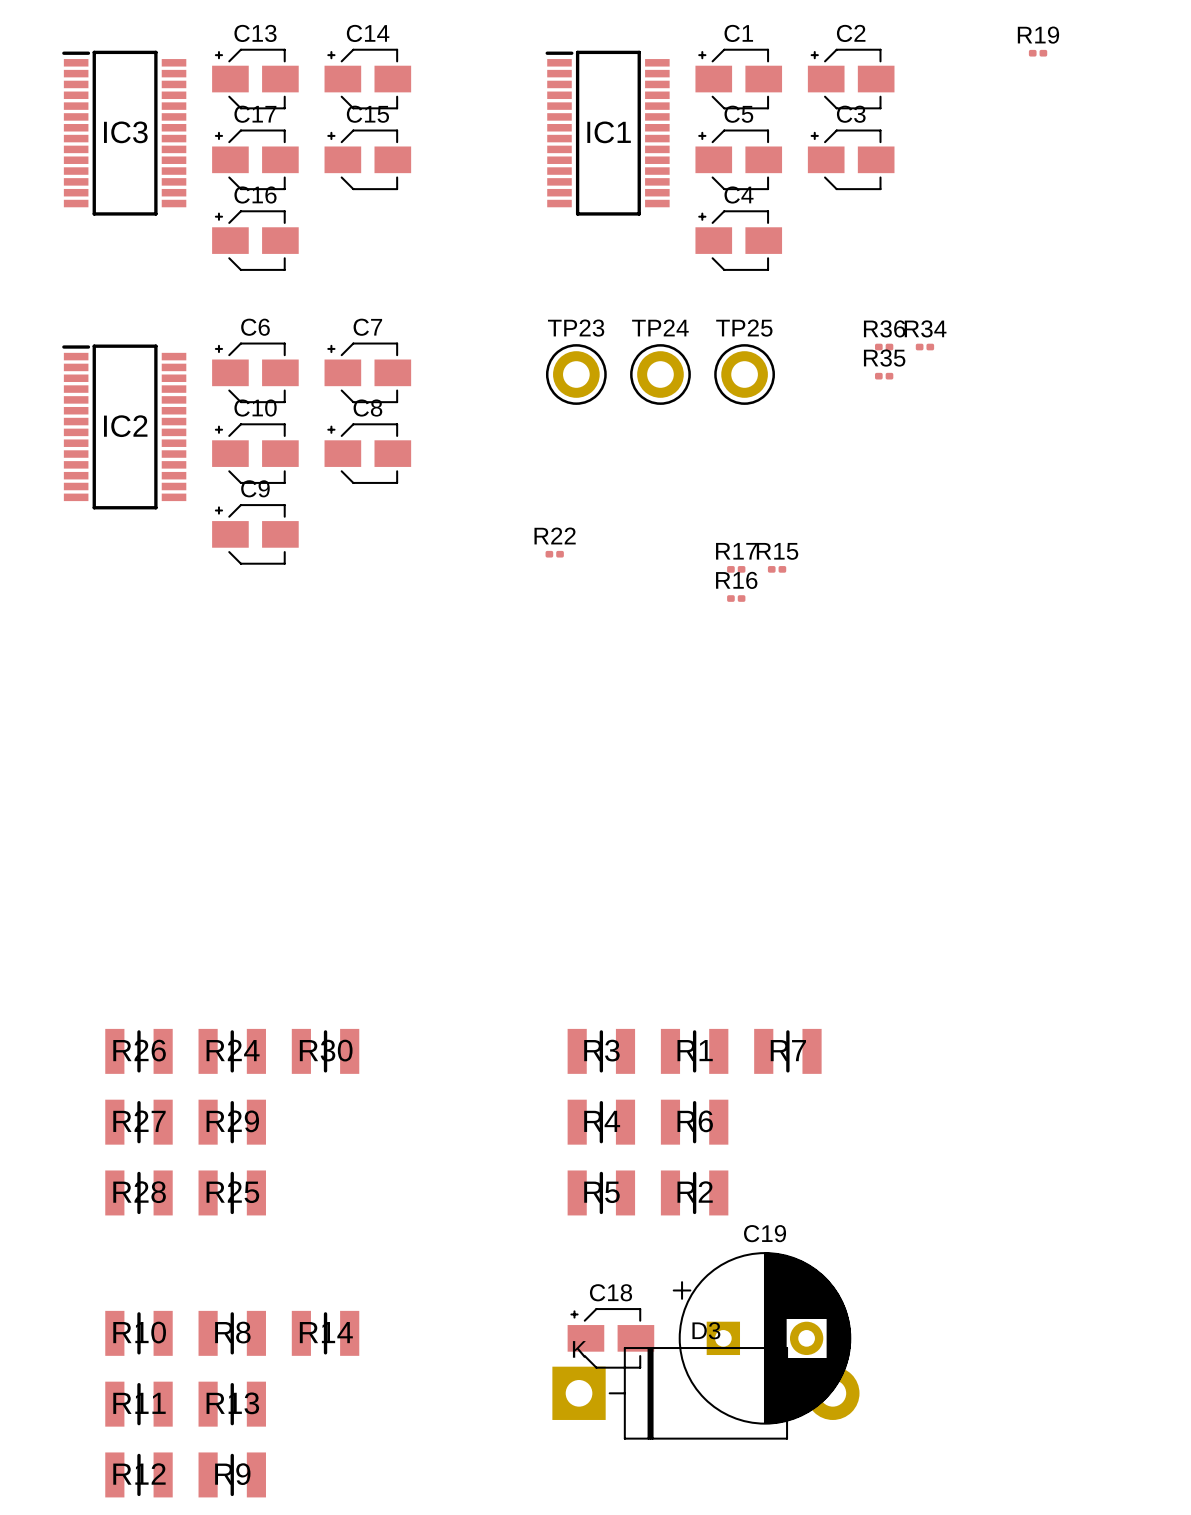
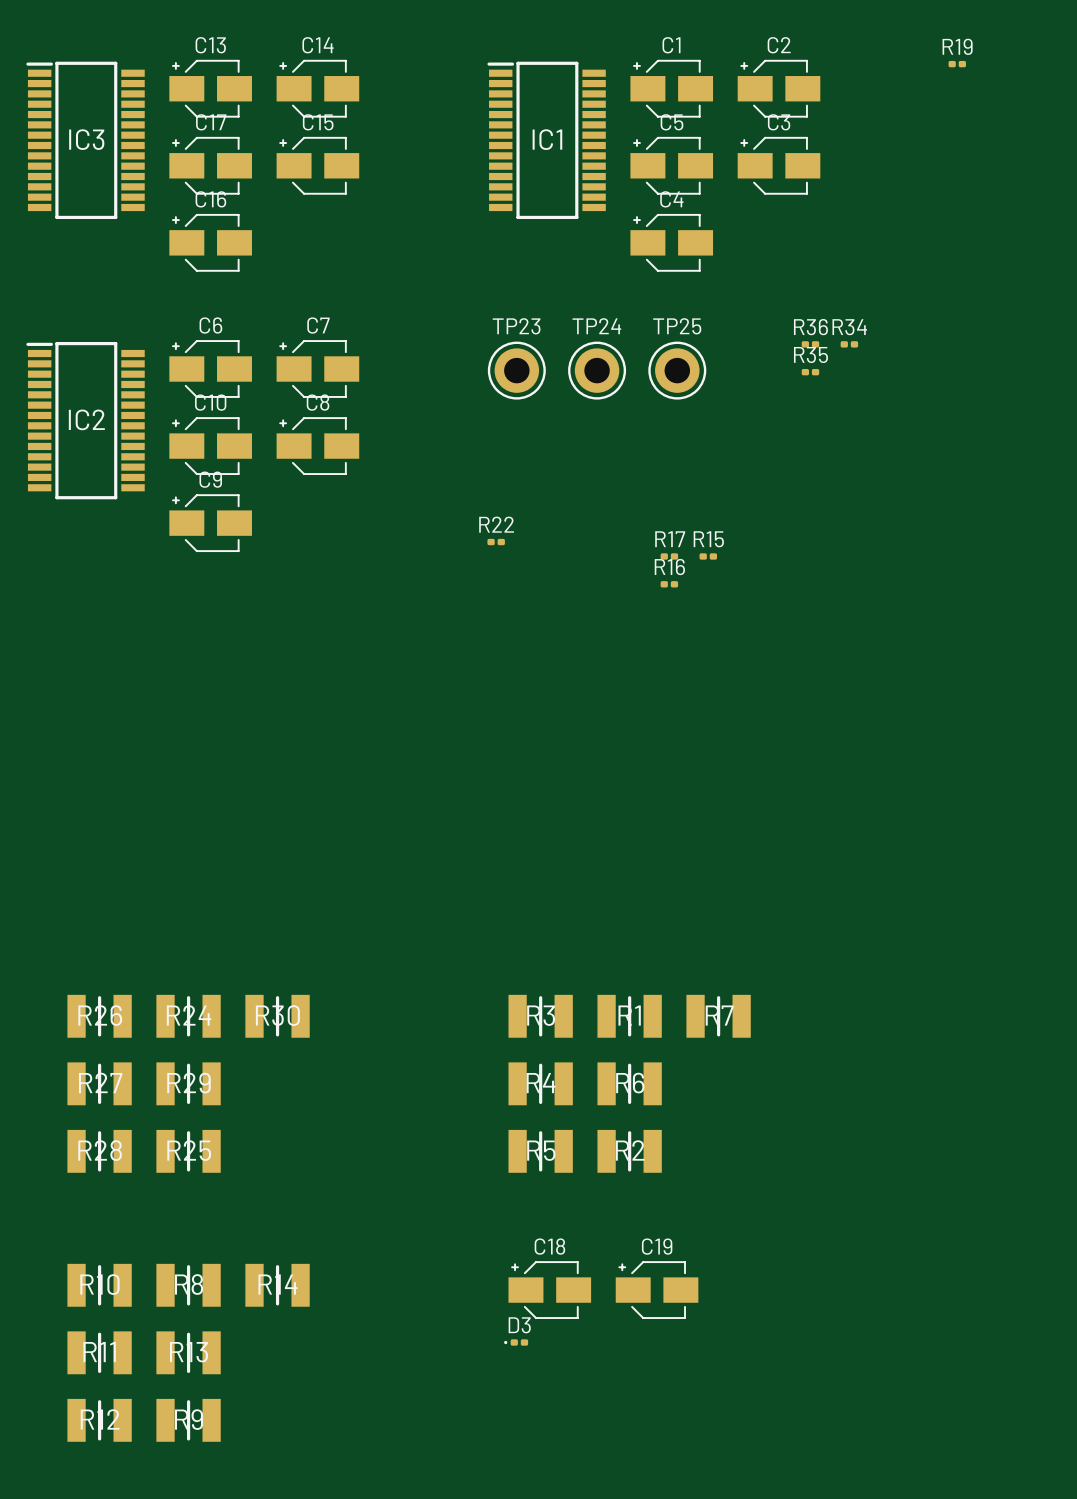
C19 name position: C19 (765, 1233) -> C19 (657, 1246)
C19 footprint: [672, 1252, 852, 1425] -> [615, 1261, 699, 1319]
D3 name position: D3 (706, 1330) -> D3 (519, 1325)
D3 footprint: [552, 1347, 860, 1440] -> [504, 1339, 529, 1346]

